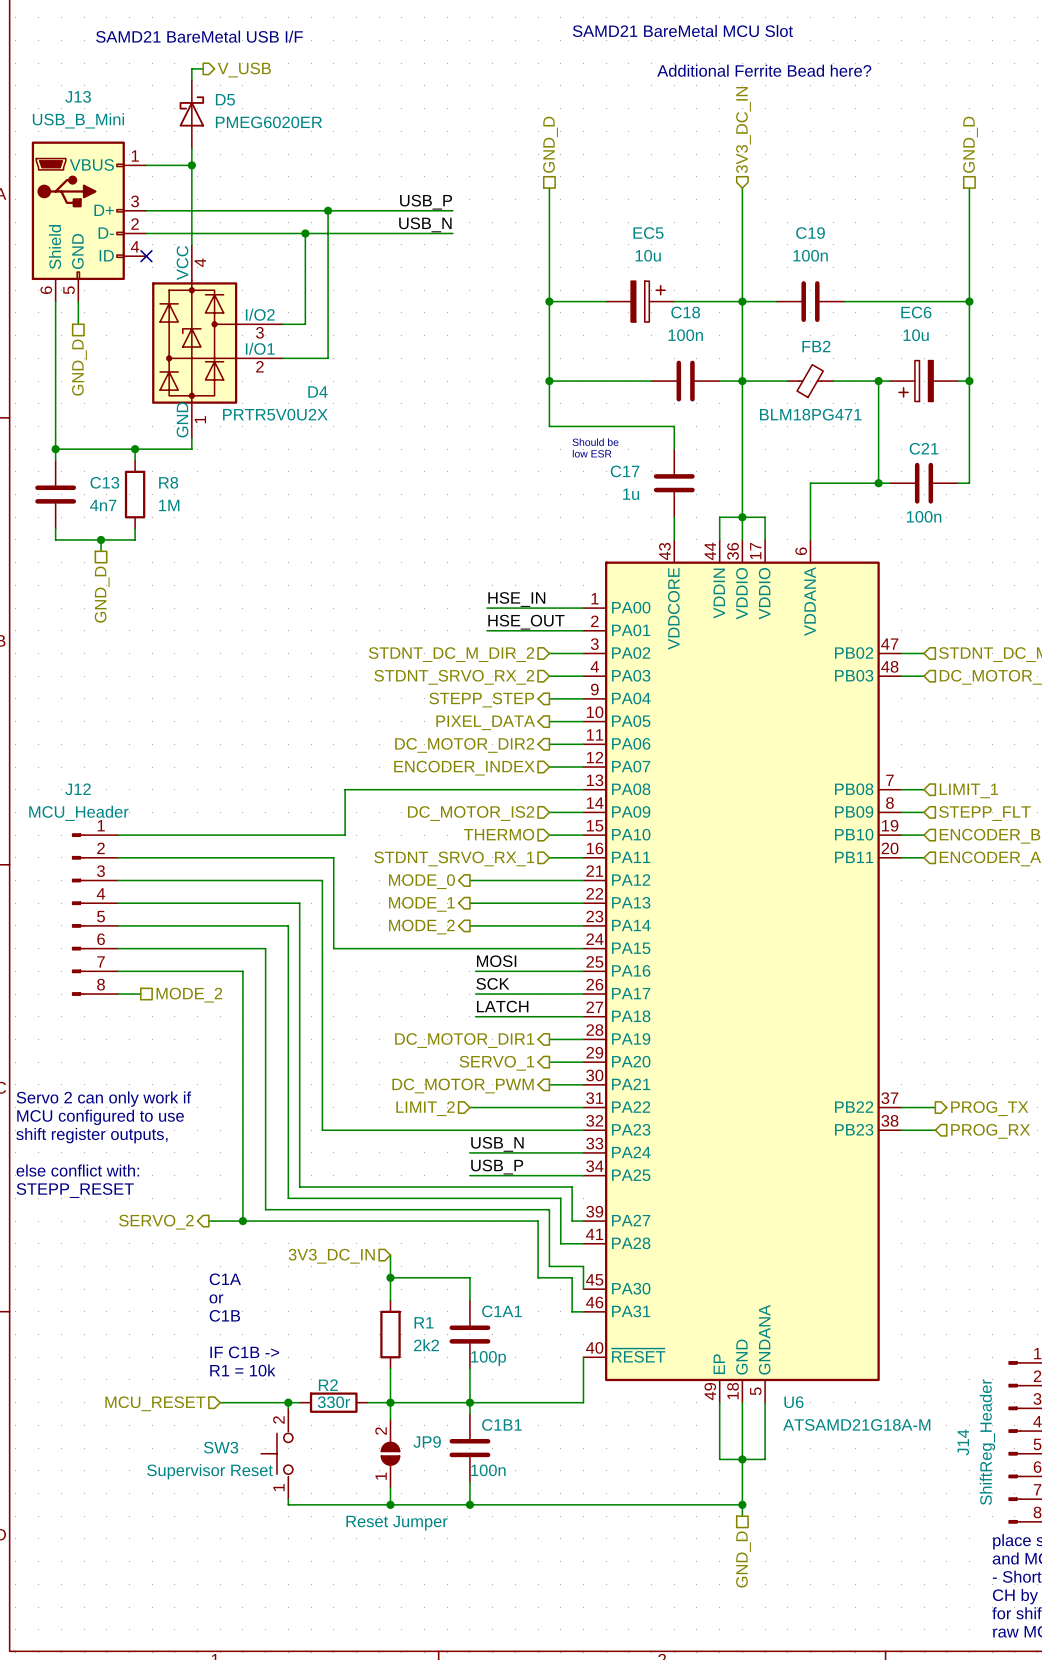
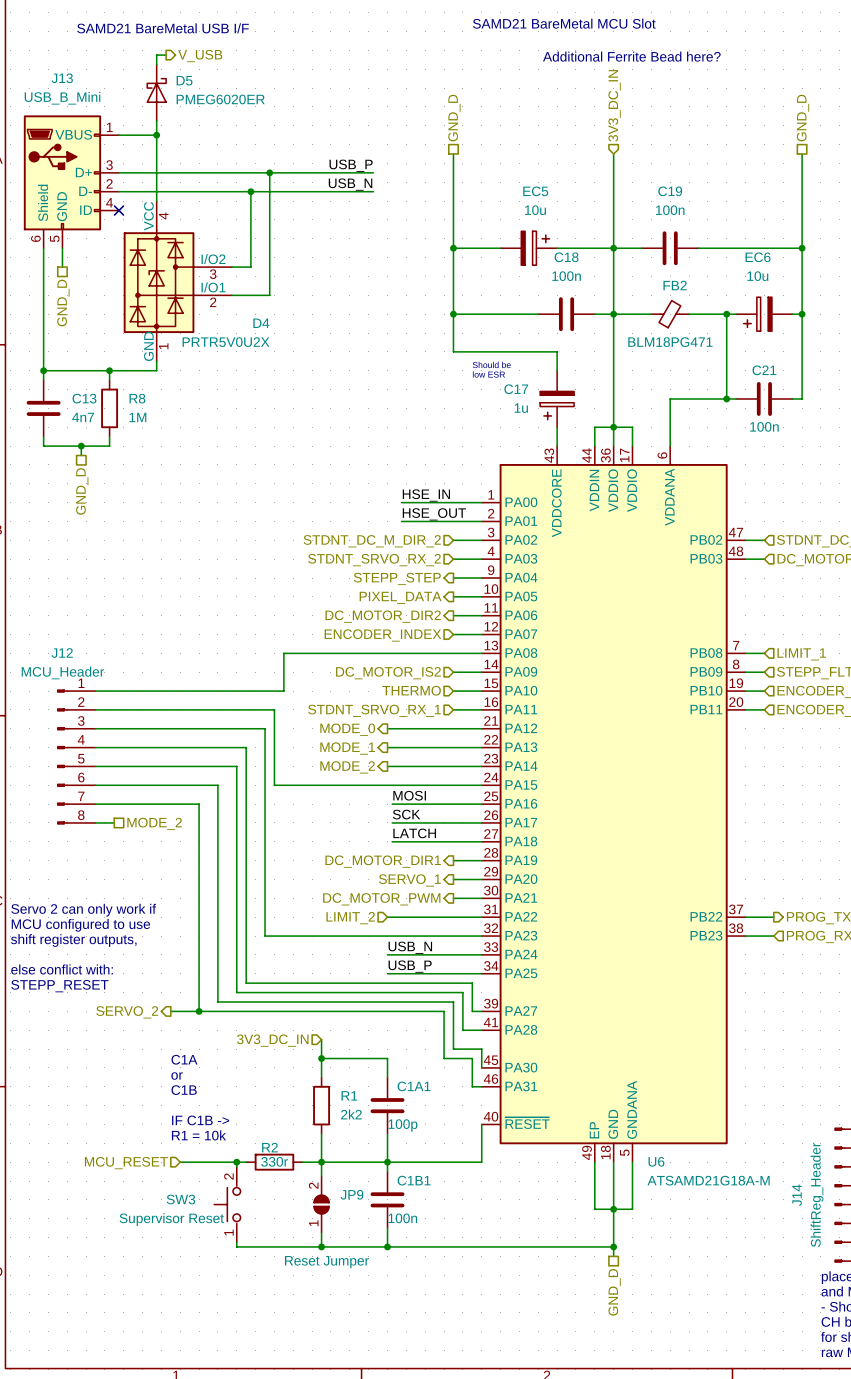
C17 symbol: [653, 449, 695, 518] -> [540, 370, 575, 428]

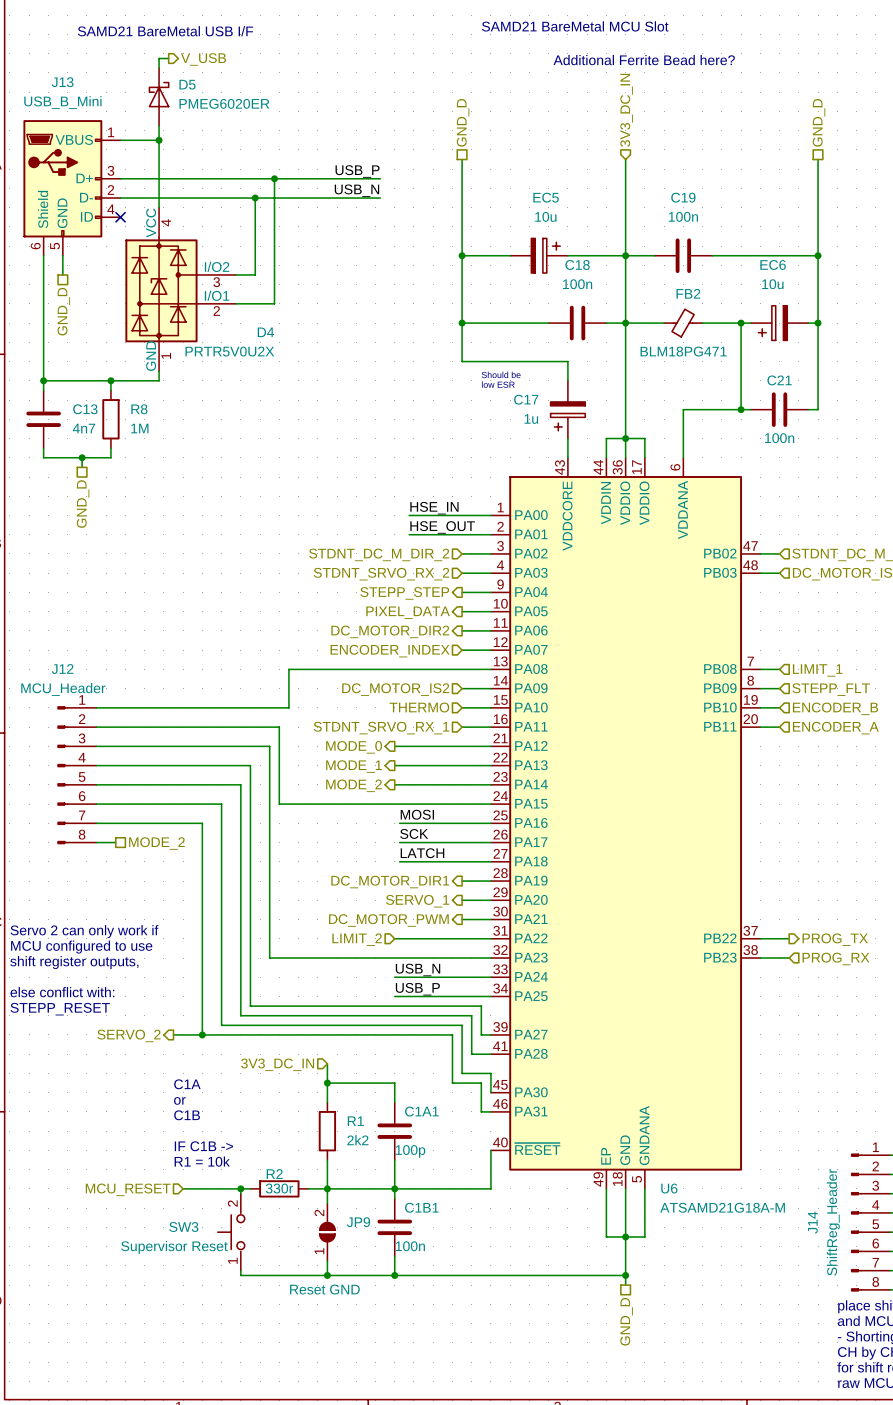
JP9 value: Reset Jumper (326, 1262) -> Reset GND (324, 1289)

